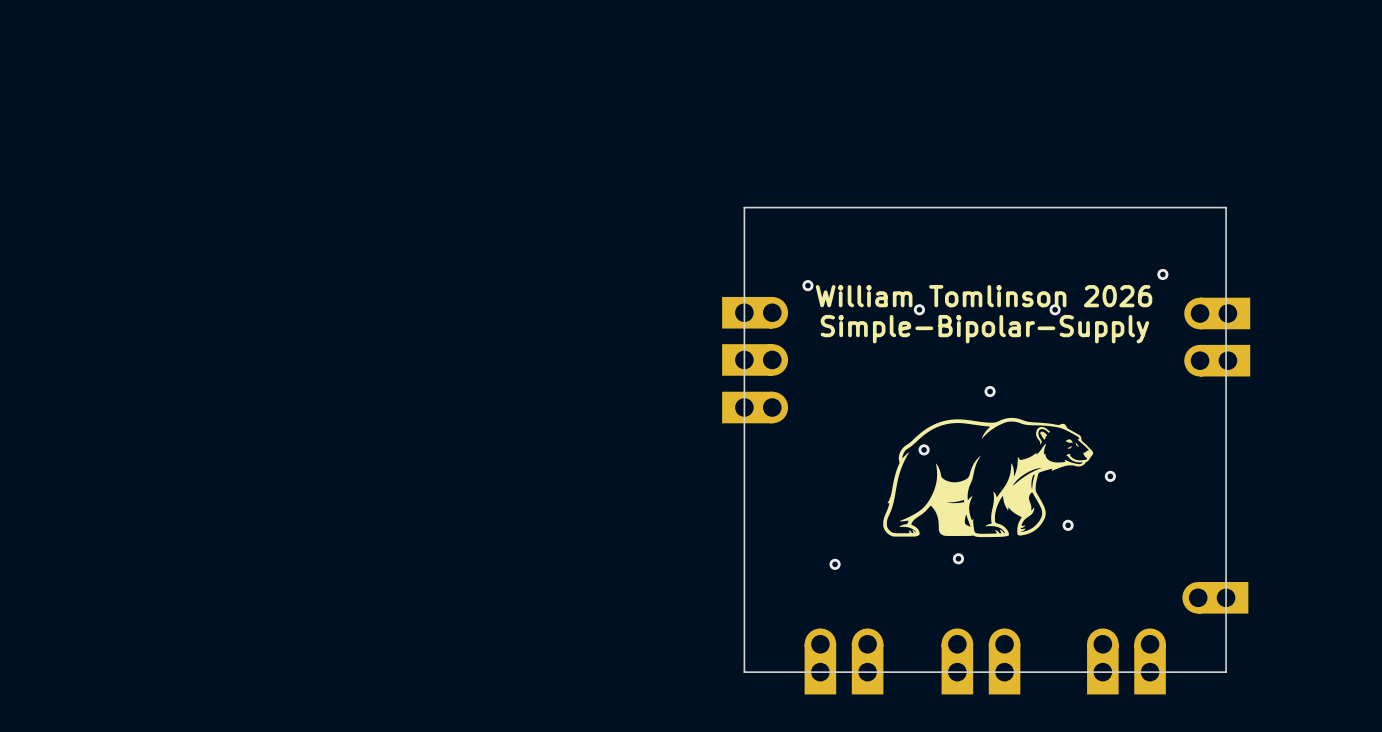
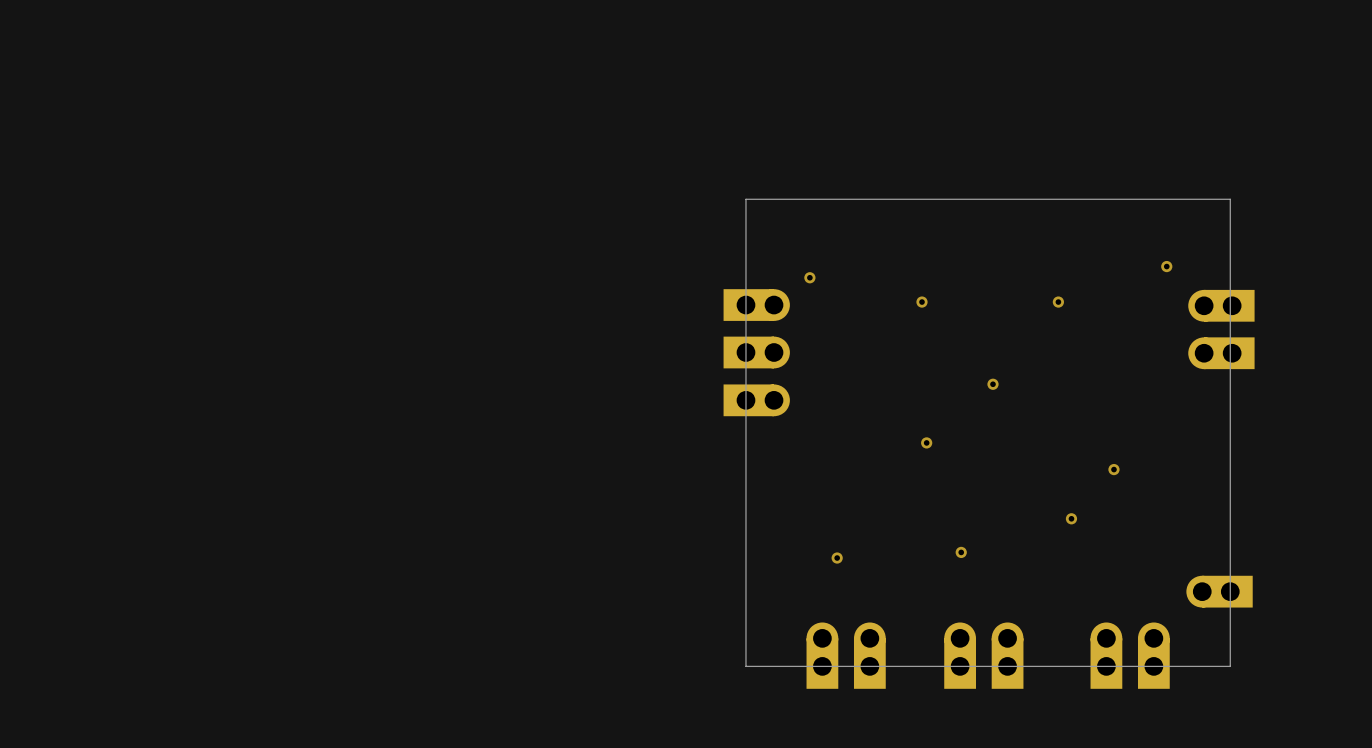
text: William Tomlinson 2026 (984, 296) -> none
text: Simple-Bipolar-Supply (984, 329) -> none
drawing: [883, 417, 1094, 538] -> none

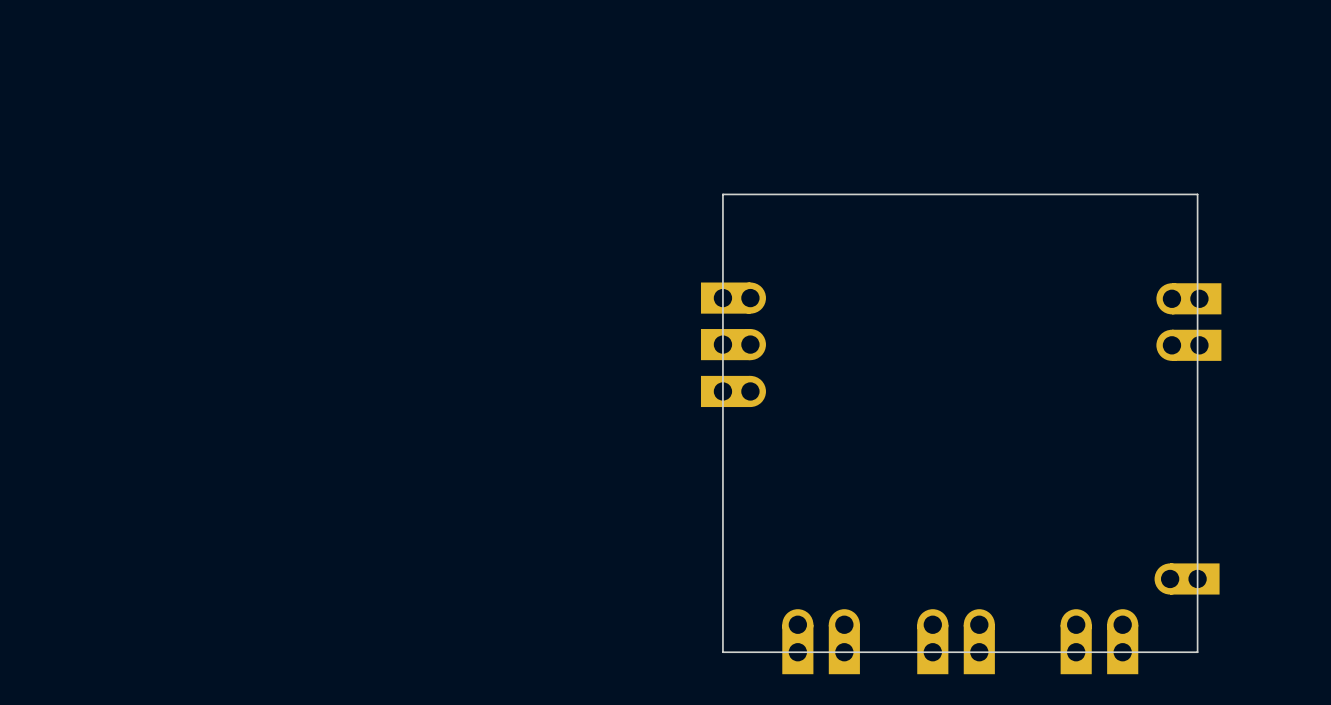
via: (1166, 266) -> none
via: (809, 277) -> none
via: (921, 302) -> none
via: (1058, 302) -> none
via: (993, 384) -> none
via: (926, 442) -> none
via: (1113, 469) -> none
via: (1071, 518) -> none
via: (961, 552) -> none
via: (837, 558) -> none

